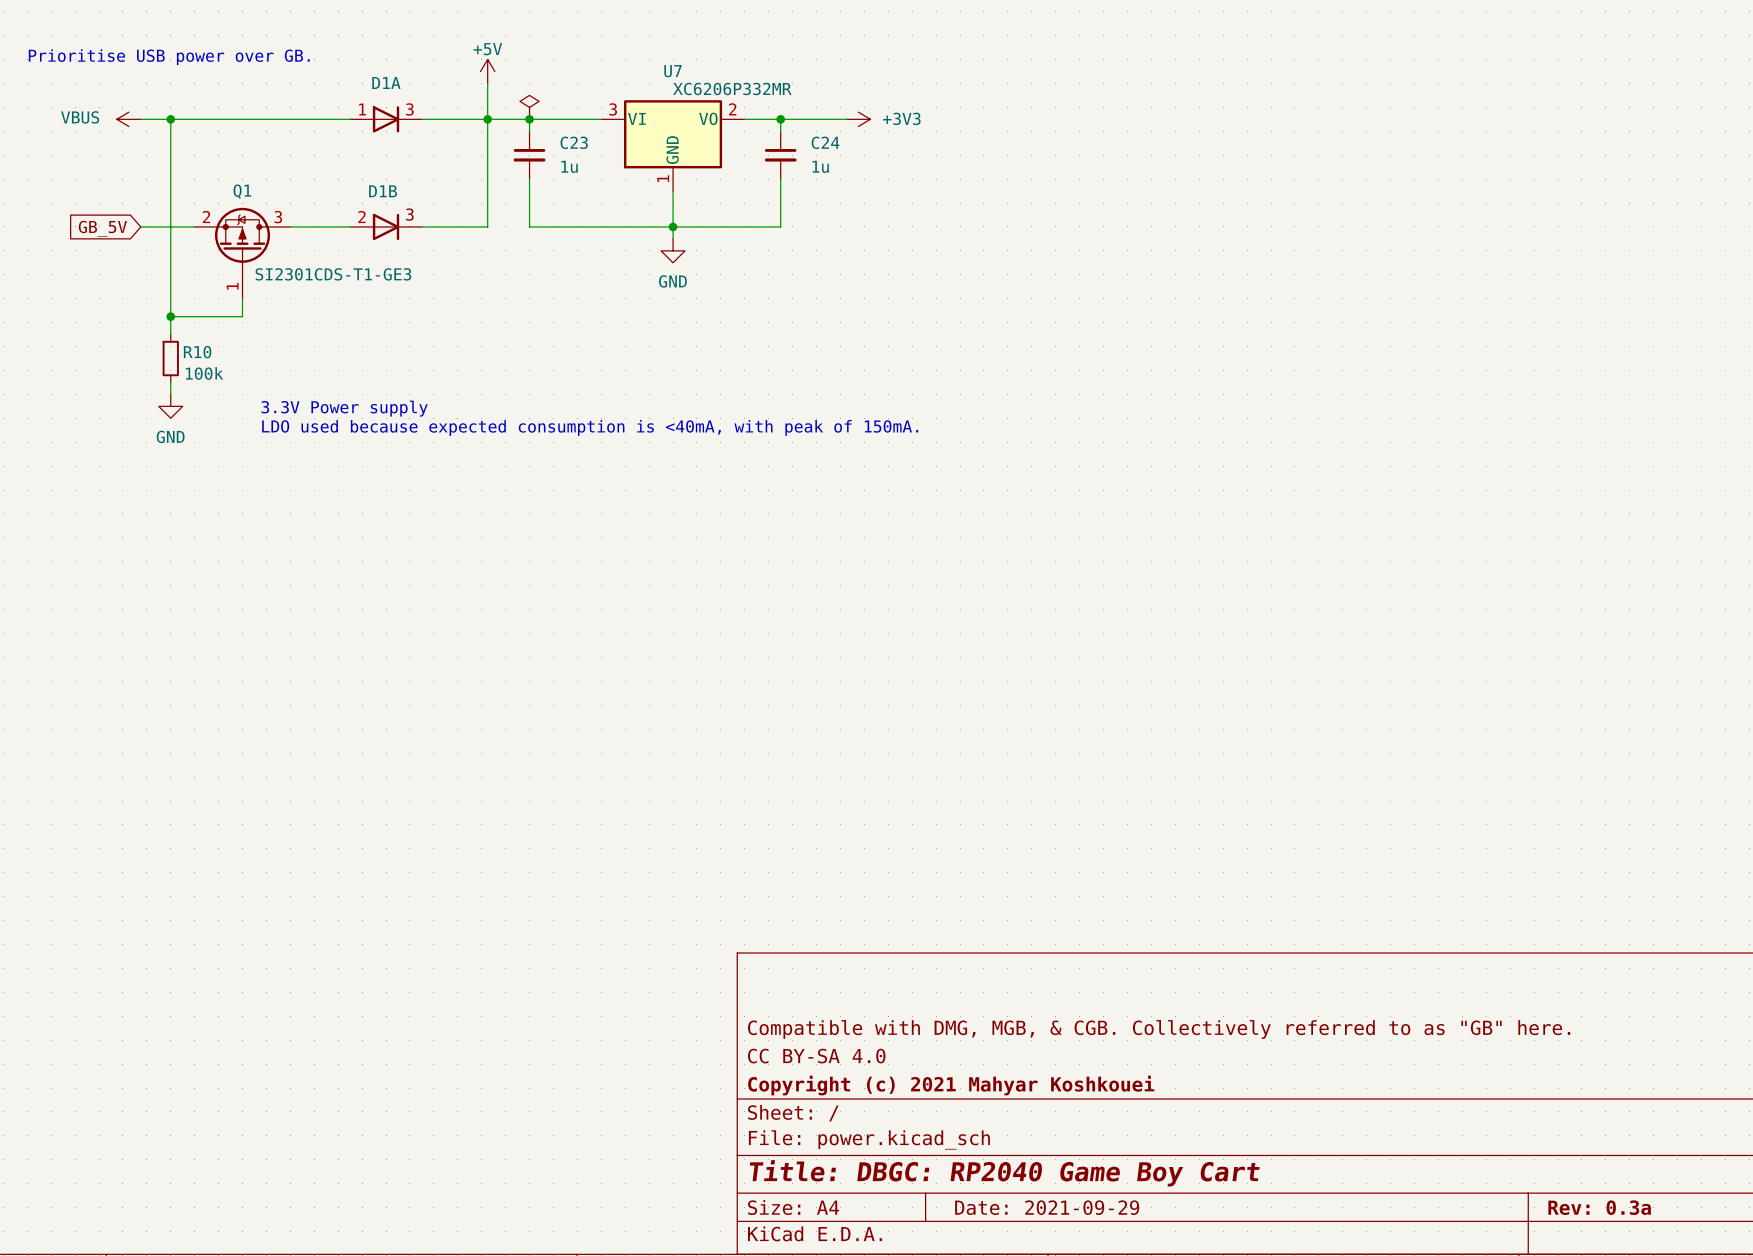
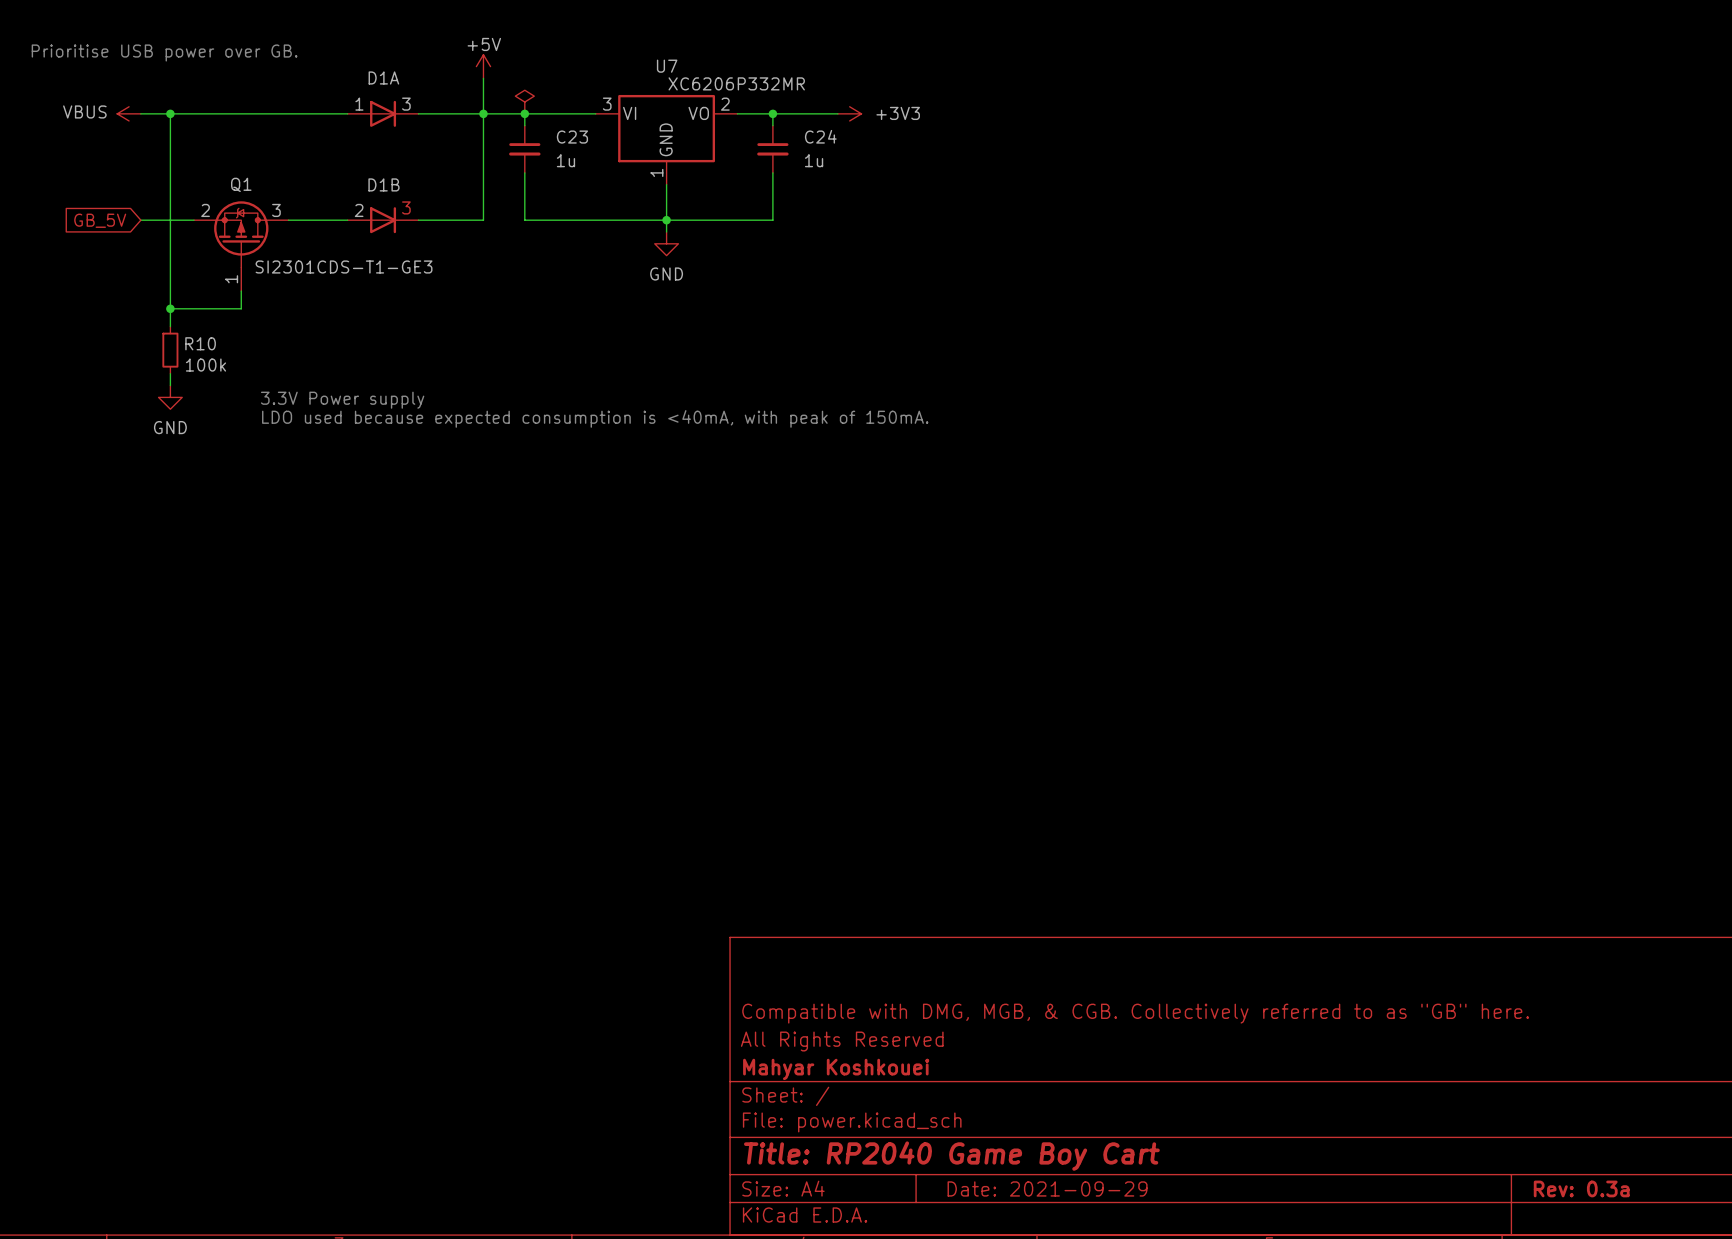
title block: CC BY-SA 4.0 (816, 1056) -> All Rights Reserved (842, 1041)
title block: Copyright (c) 2021 Mahyar Koshkouei (951, 1085) -> Mahyar Koshkouei (836, 1069)
title block: Title: DBGC: RP2040 Game Boy Cart (1004, 1173) -> Title: RP2040 Game Boy Cart (951, 1156)

